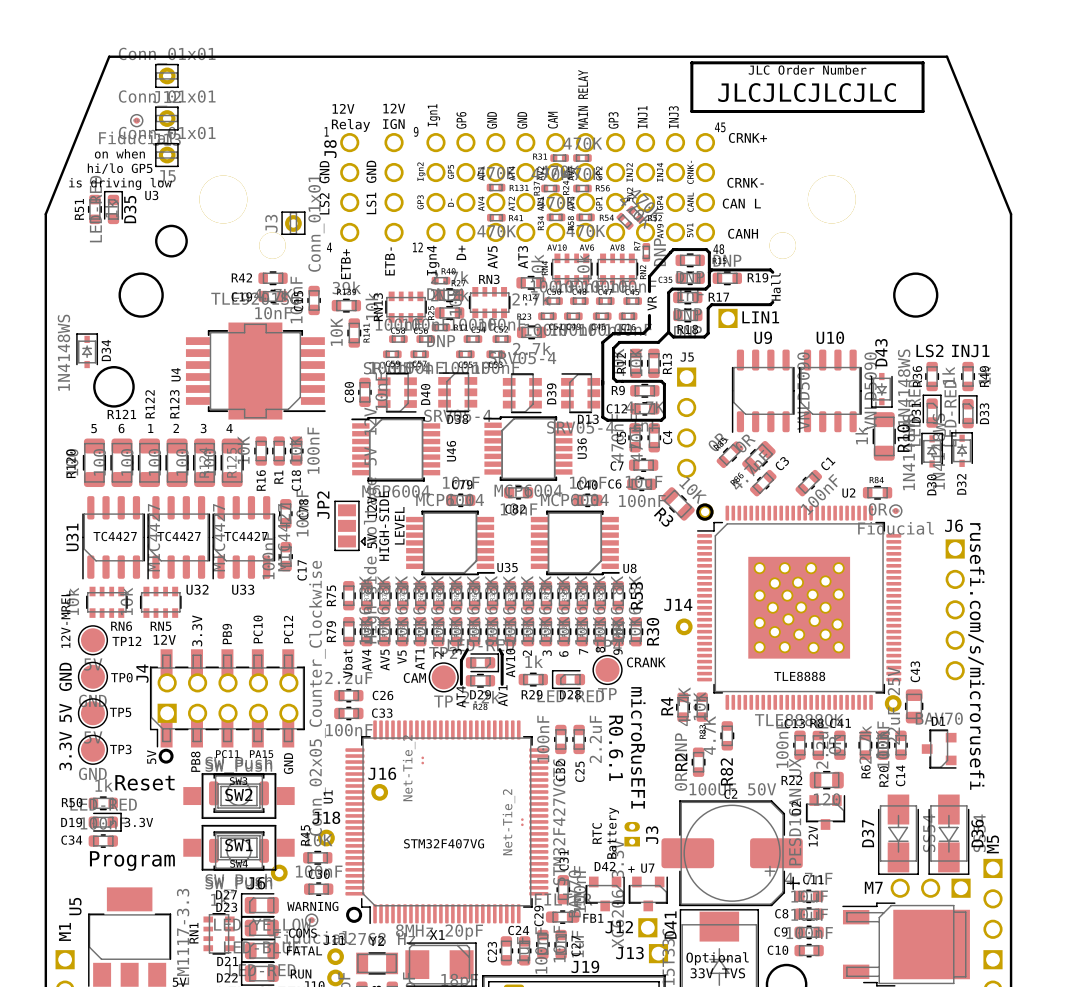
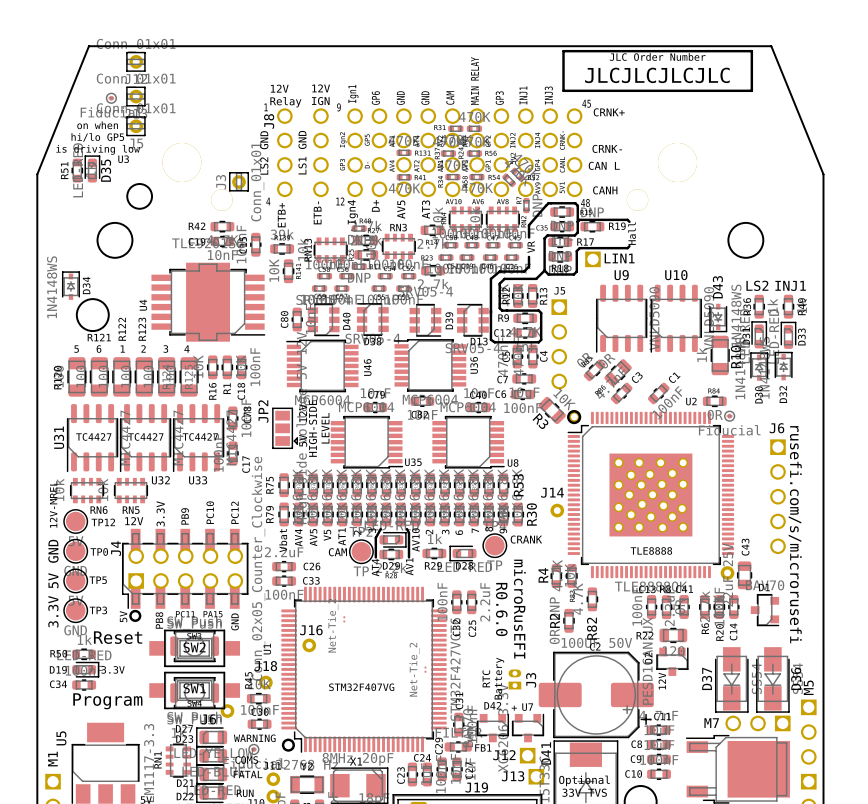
text: R0.6.1 (616, 748) -> R0.6.0 (501, 609)

